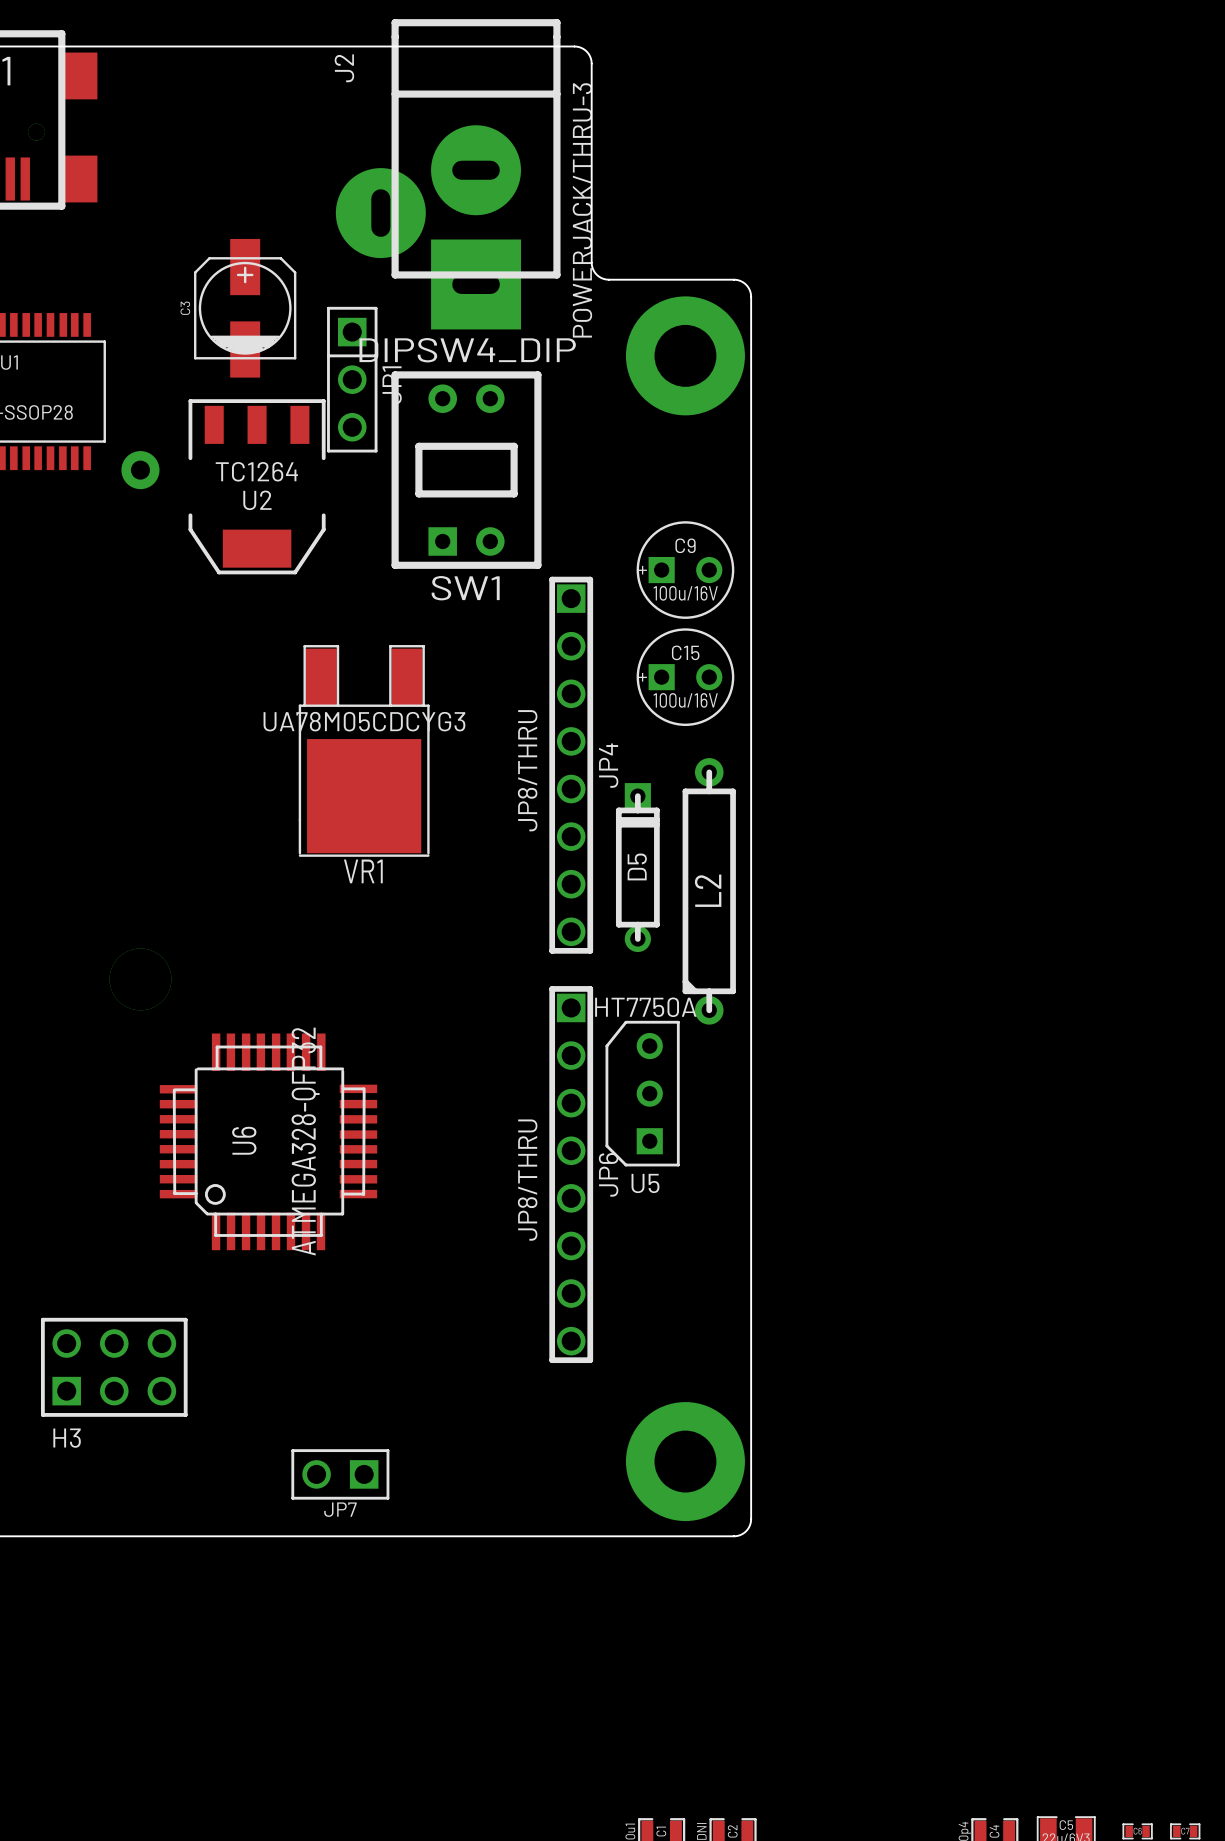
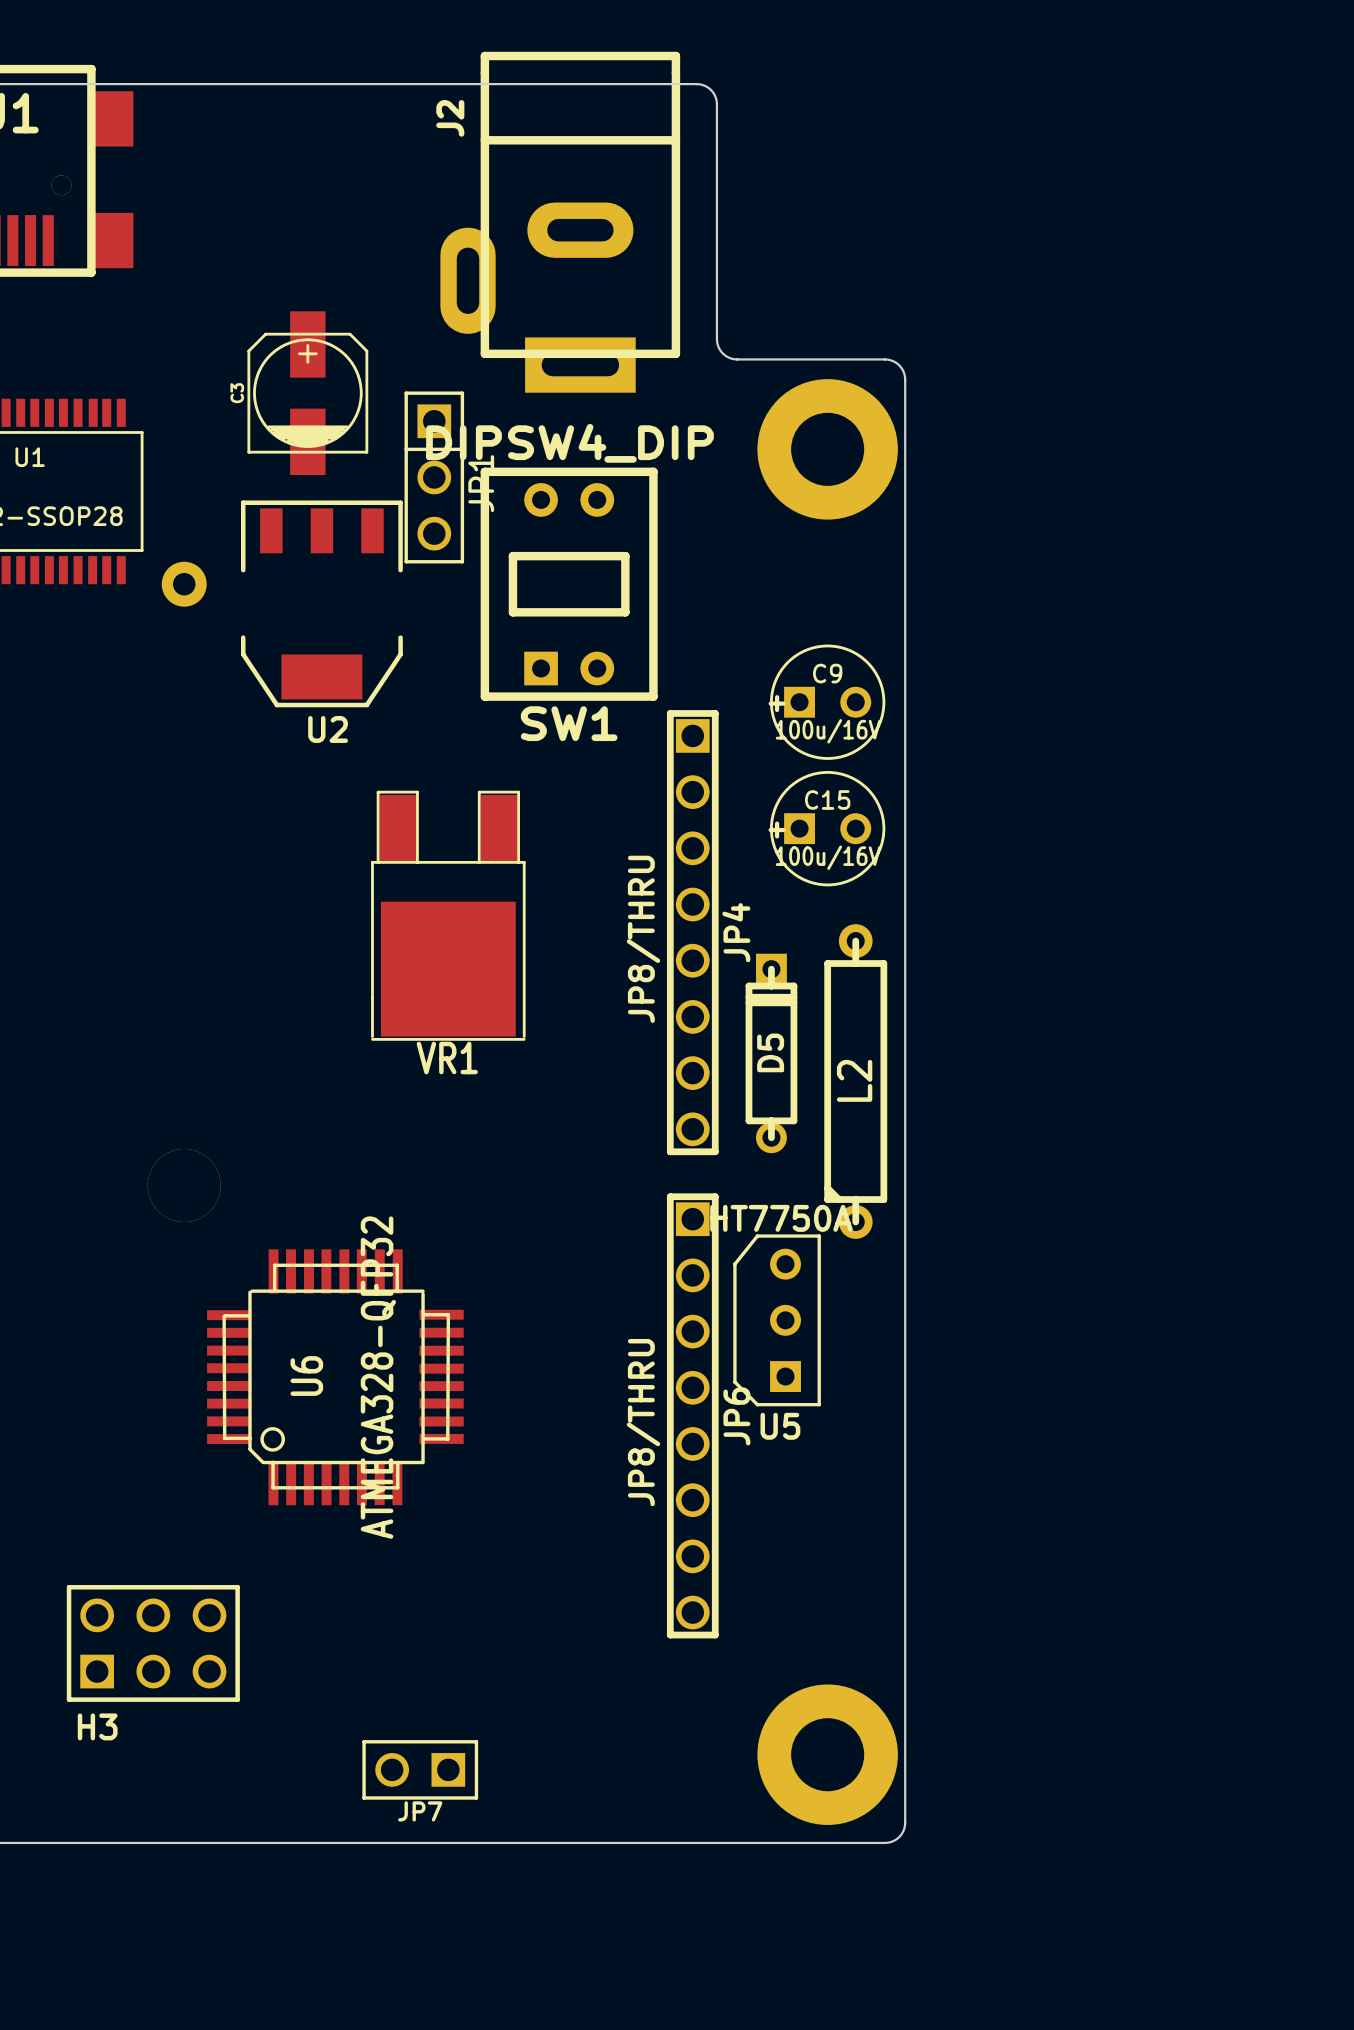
J2 footprint: [335, 19, 561, 330] -> [440, 51, 681, 393]
J2 value: POWERJACK/THRU-3 (582, 210) -> none
U2 value: TC1264 (256, 471) -> none
U2 name position: U2 (257, 500) -> U2 (328, 729)
VR1 value: UA78M05CDCYG3 (364, 721) -> none

